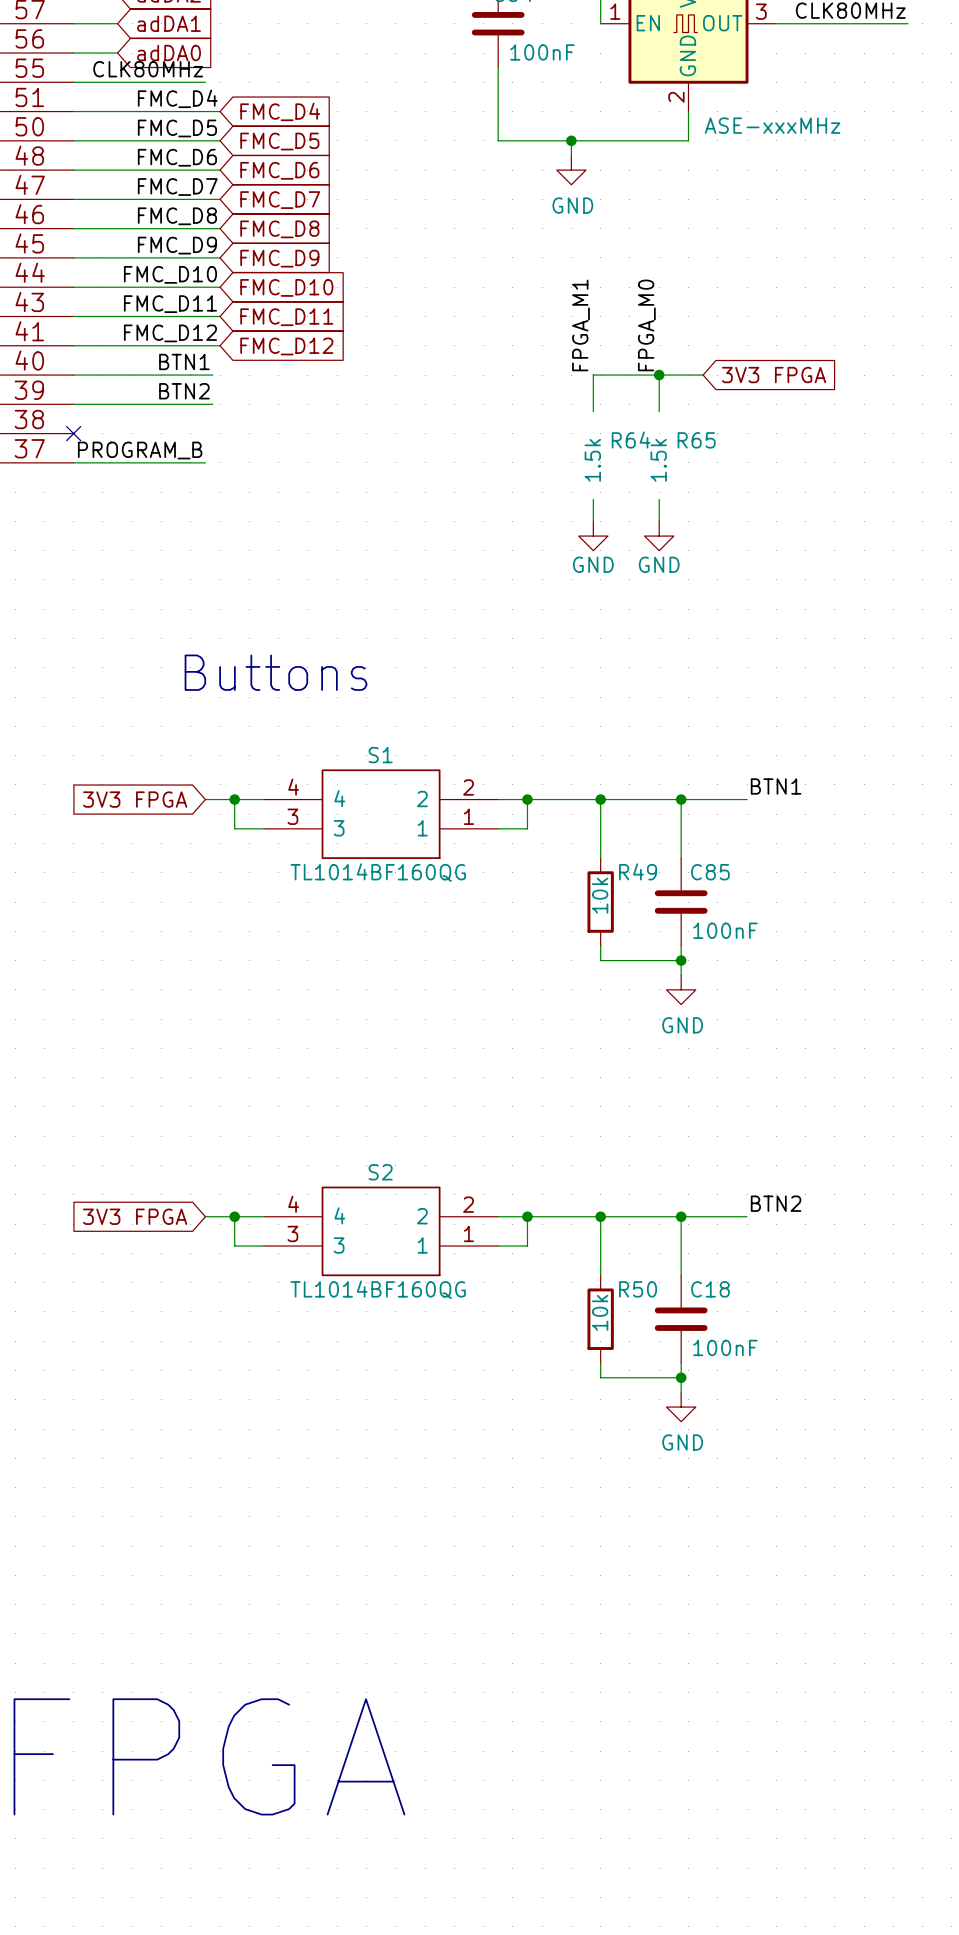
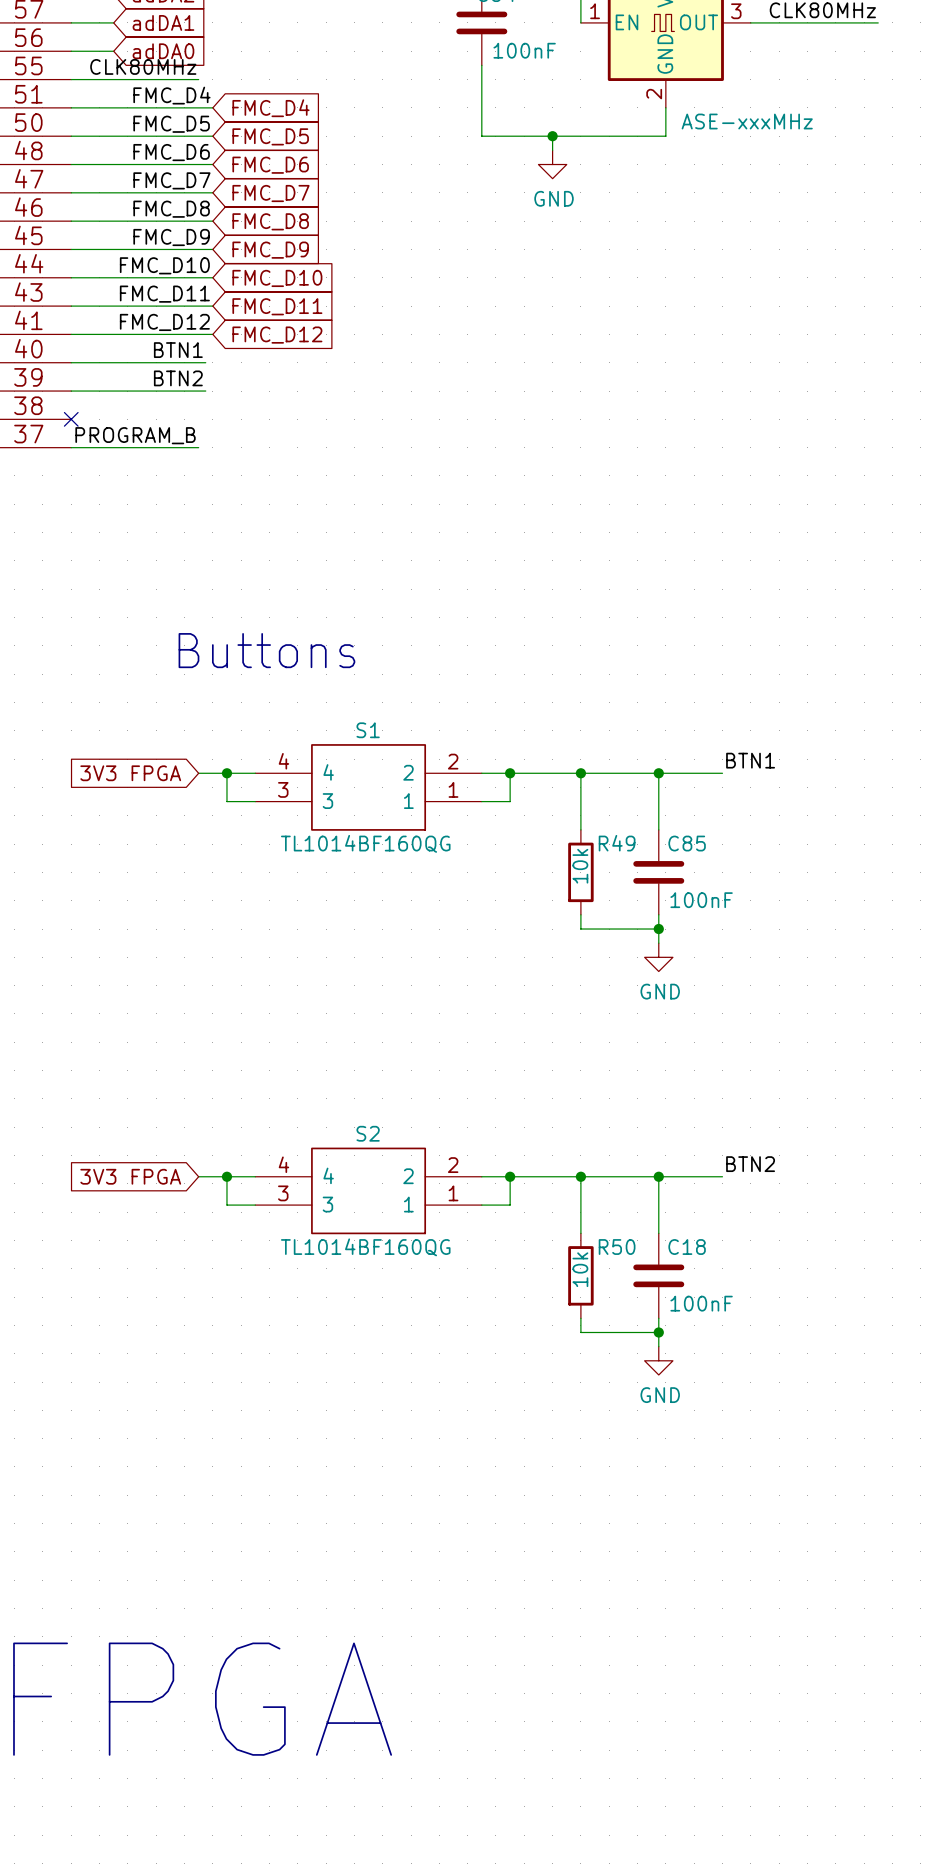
label: FPGA_M1 (580, 325) -> none
label: FPGA_M0 (646, 325) -> none
wire: (659, 375) (659, 411) -> none
junction: (659, 375) -> none
wire: (703, 375) (593, 375) (593, 411) -> none
global label: 3V3 FPGA (774, 375) -> none
R64: 1.5k (617, 456) -> none
R65: 1.5k (683, 456) -> none
wire: (593, 499) (593, 521) -> none
wire: (659, 499) (659, 521) -> none
power symbol: GND (593, 536) -> none
power symbol: GND (659, 536) -> none

